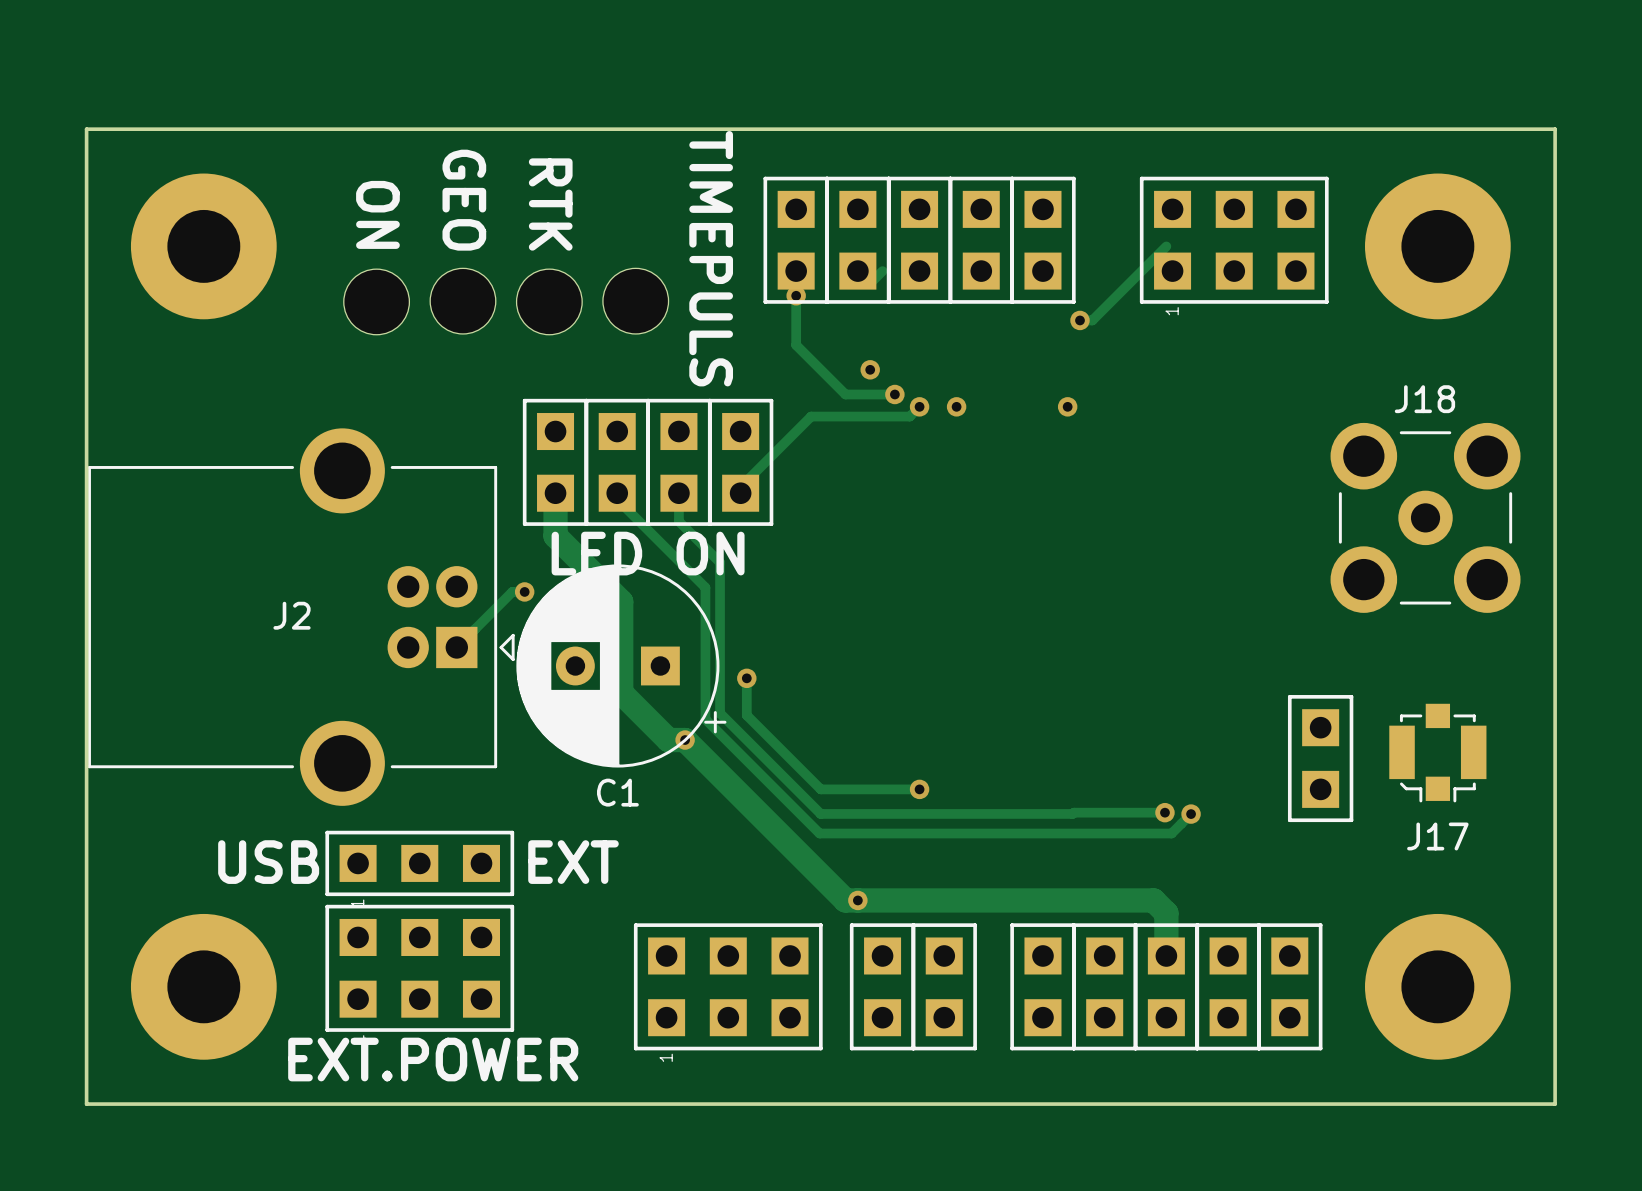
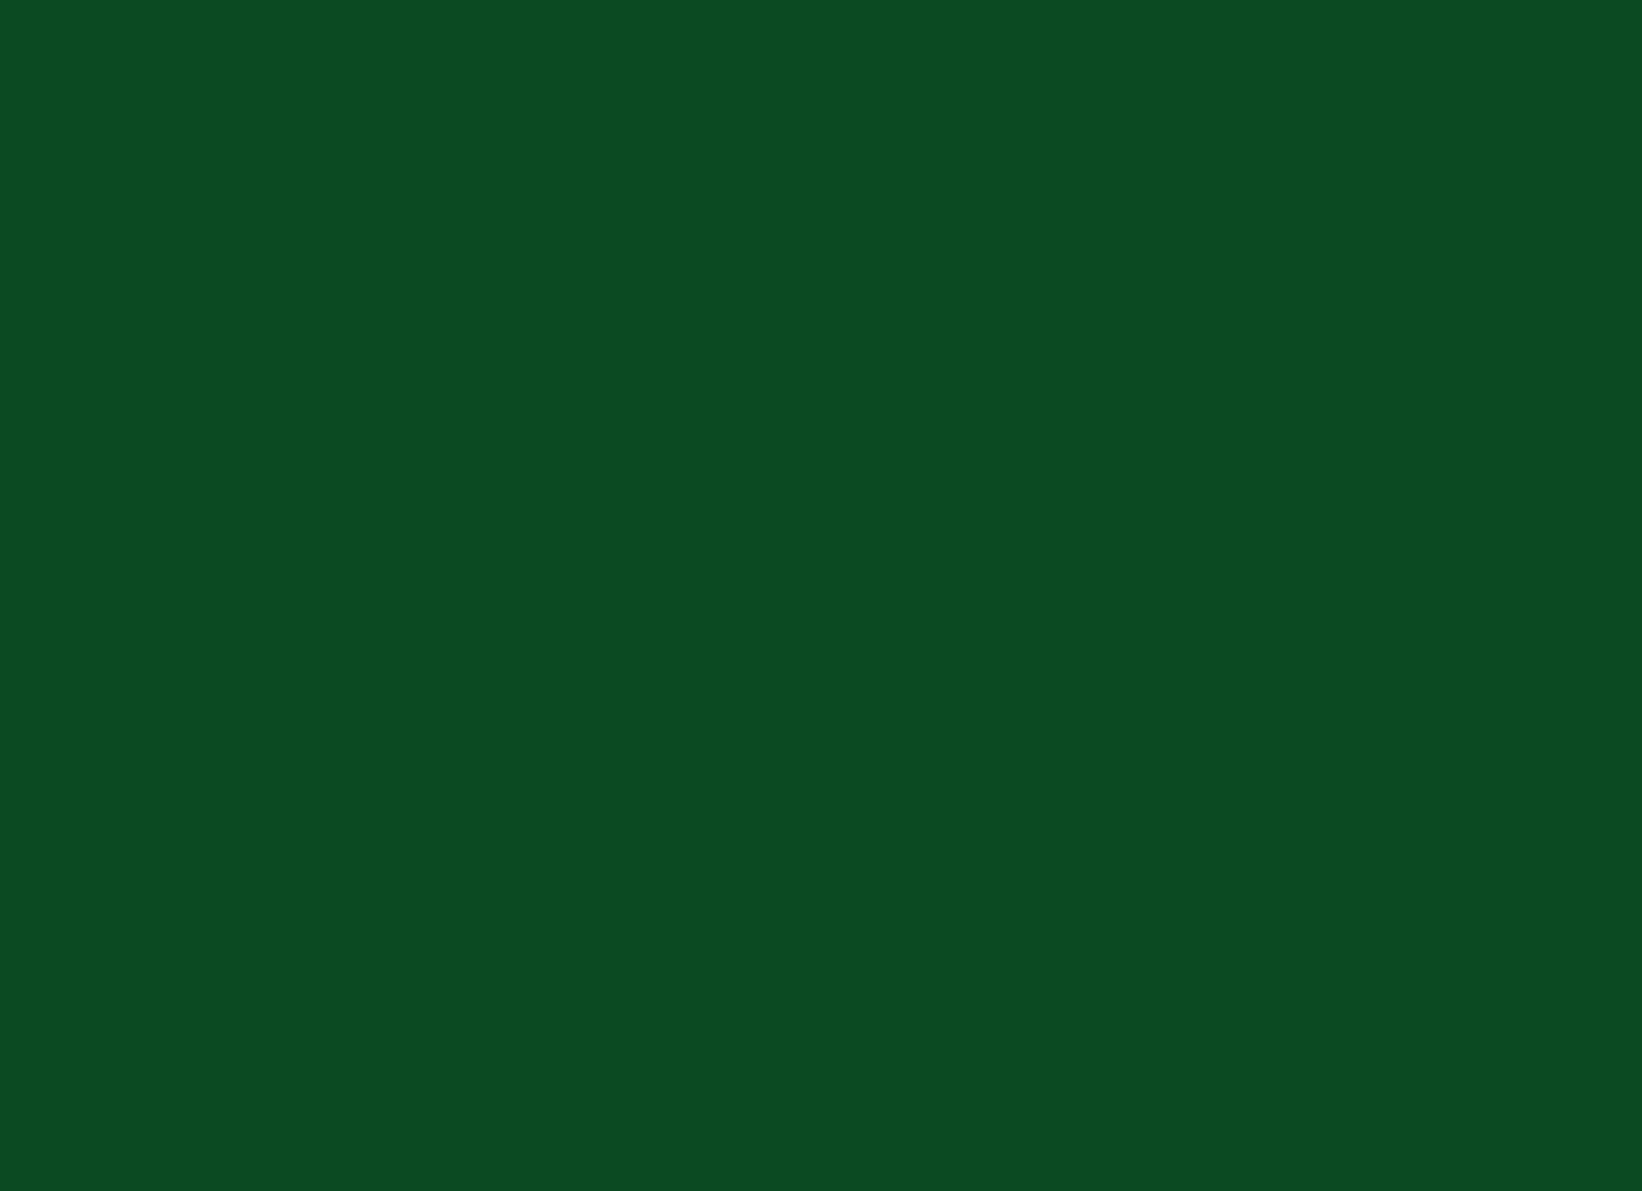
board edge: (86, 129) (1555, 129) (1555, 1104) (86, 1104) (86, 129) -> none
text: GEO (464, 200) -> none
text: RTK (550, 204) -> none
text: ON (377, 214) -> none
part: (796, 240) -> none
part: (857, 240) -> none
part: (919, 240) -> none
part: (981, 240) -> none
part: (1042, 240) -> none
part: (1234, 240) -> none
part: (203, 246) -> none
track: (1166, 246) (1092, 320) (1080, 320) -> none
part: (1437, 246) -> none
text: TIMEPULS (711, 258) -> none
track: (882, 271) (870, 283) -> none
track: (796, 295) (796, 345) (845, 394) (894, 394) -> none
via: (796, 295) -> none
part: (376, 301) -> none
part: (462, 301) -> none
part: (549, 301) -> none
part: (635, 301) -> none
via: (1080, 320) -> none
via: (870, 369) -> none
via: (894, 394) -> none
track: (919, 406) (909, 416) (811, 416) (740, 487) (740, 493) -> none
via: (919, 406) -> none
via: (956, 406) -> none
via: (1067, 406) -> none
part: (555, 462) -> none
part: (617, 462) -> none
part: (678, 462) -> none
part: (740, 462) -> none
track: (555, 493) (555, 536) (621, 601) (621, 692) (668, 740) (685, 740) (845, 900) (1153, 900) (1166, 913) (1166, 955) -> none
track: (617, 493) (617, 499) (705, 587) (705, 719) (819, 833) (1171, 833) (1191, 814) -> none
track: (678, 493) (678, 521) (720, 562) (720, 713) (820, 813) (1164, 812) -> none
J18: (1425, 517) -> none
text: LED ON (648, 553) -> none
track: (524, 591) (512, 591) (456, 647) -> none
via: (524, 591) -> none
J2: (301, 617) -> none
C1: (621, 665) -> none
track: (746, 678) (746, 715) (820, 789) (919, 789) -> none
via: (746, 678) -> none
via: (685, 740) -> none
J17: (1437, 753) -> none
part: (1320, 758) -> none
via: (919, 789) -> none
via: (1164, 812) -> none
via: (1191, 814) -> none
text: USB (268, 862) -> none
text: EXT (573, 862) -> none
part: (419, 863) -> none
via: (857, 900) -> none
part: (419, 968) -> none
part: (203, 986) -> none
part: (728, 986) -> none
part: (882, 986) -> none
part: (944, 986) -> none
part: (1042, 986) -> none
part: (1104, 986) -> none
part: (1166, 986) -> none
part: (1228, 986) -> none
part: (1289, 986) -> none
part: (1437, 986) -> none
text: EXT.POWER (433, 1059) -> none

